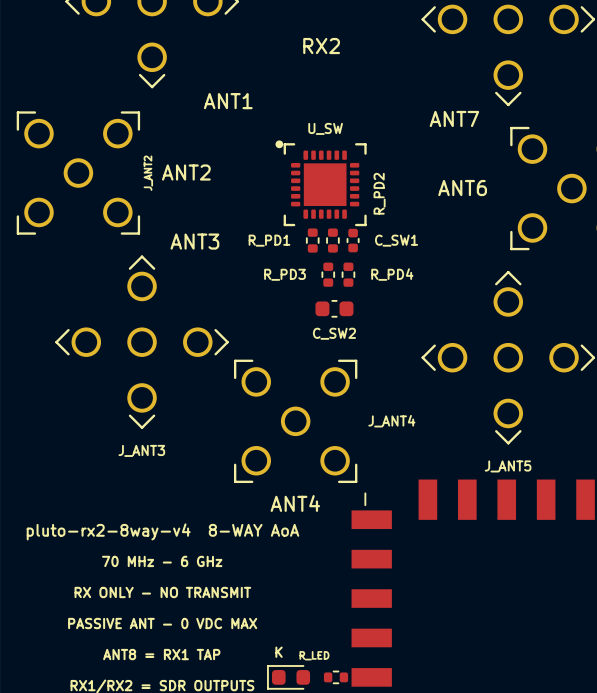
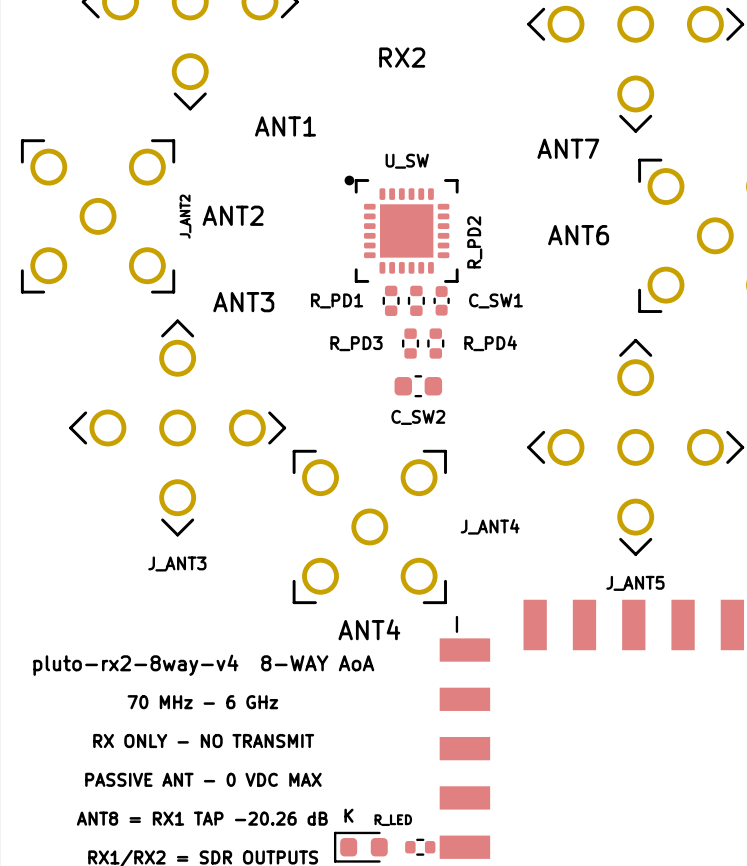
text: ANT8 = RX1 TAP (161, 654) -> ANT8 = RX1 TAP -20.26 dB (202, 818)

